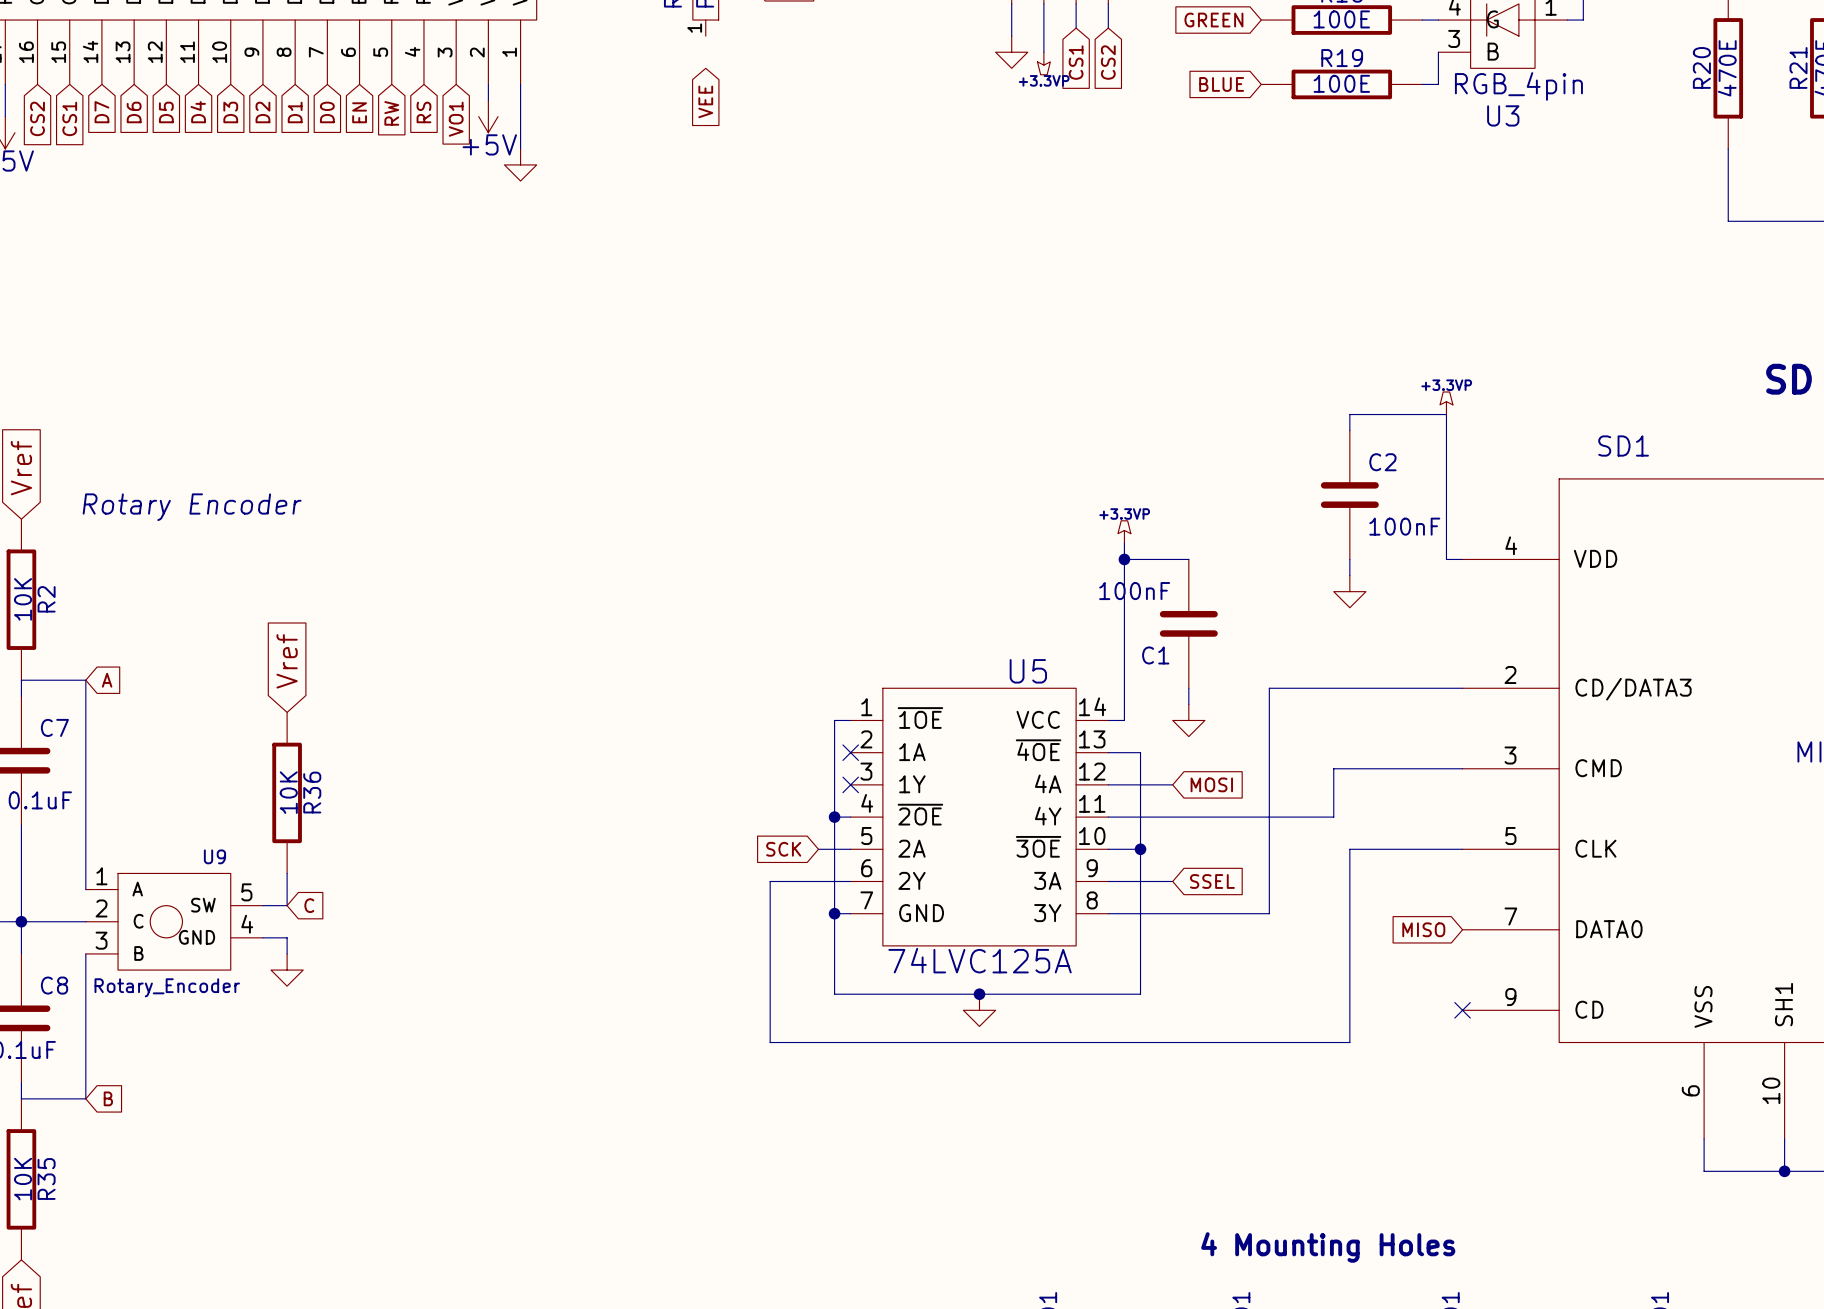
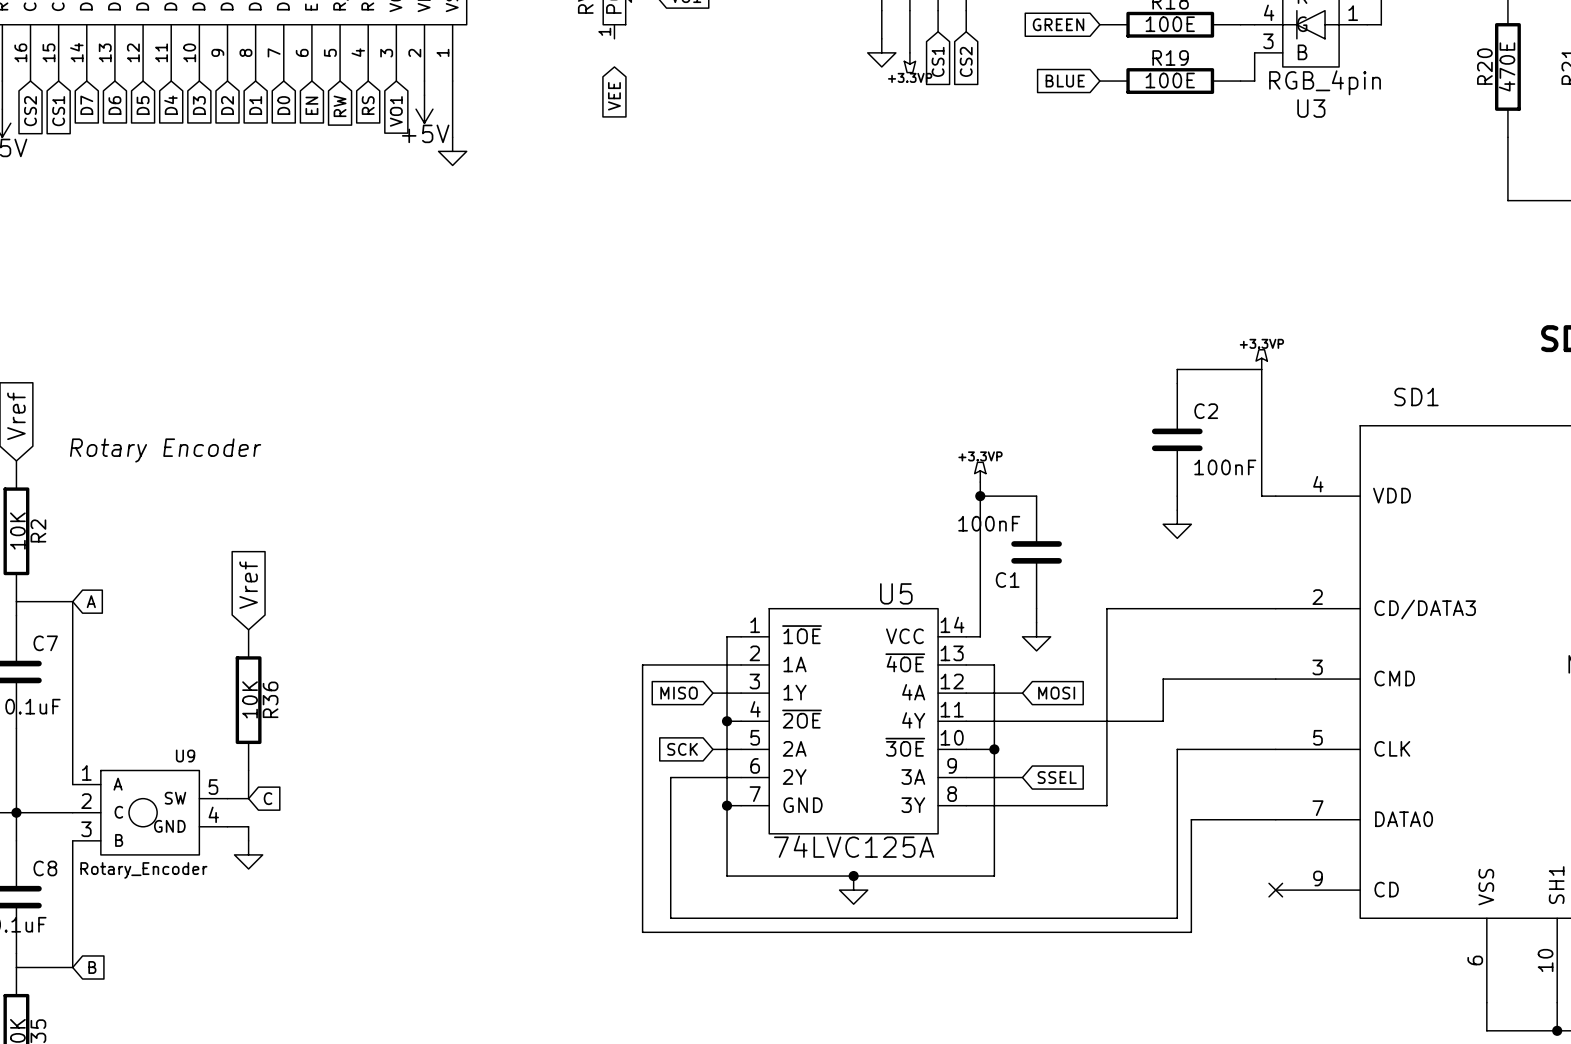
wire: none -> (741, 664) (642, 664) (642, 932) (1191, 932) (1191, 819) (1275, 819)
no-connect mark: (850, 752) -> none
global label: none -> MISO (679, 693)
wire: none -> (712, 693) (741, 693)
no-connect mark: (850, 784) -> none
global label: MISO (1423, 929) -> none

